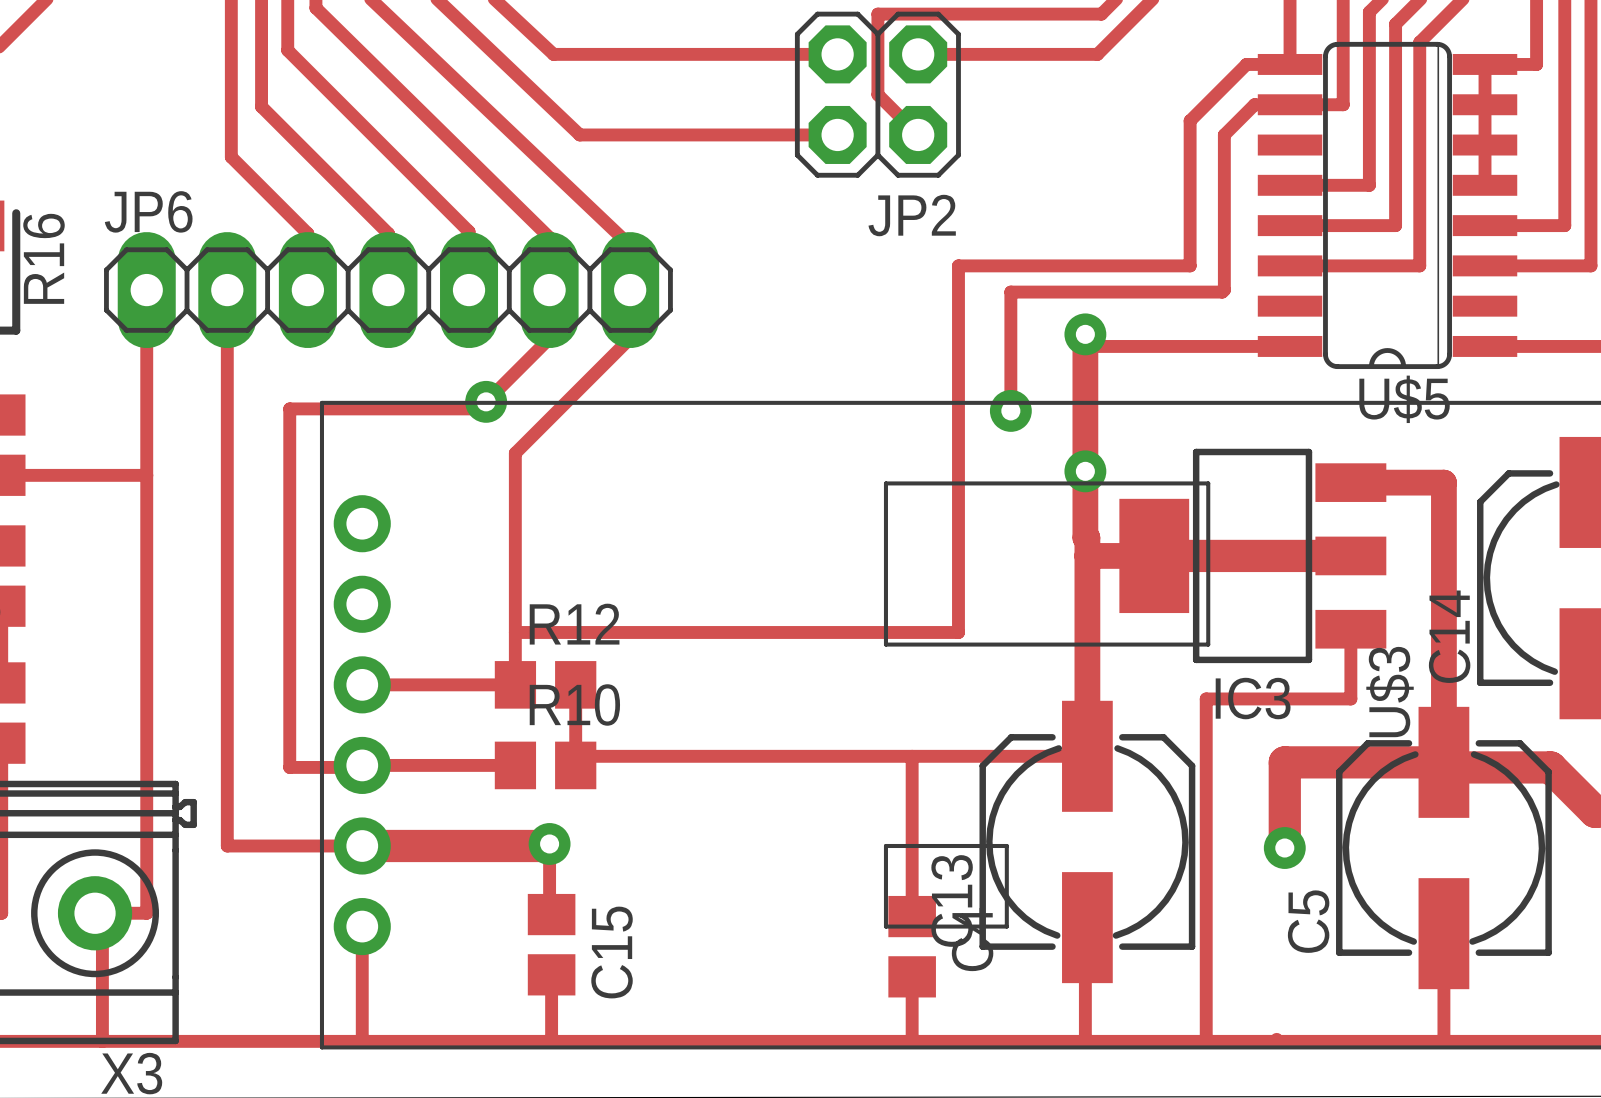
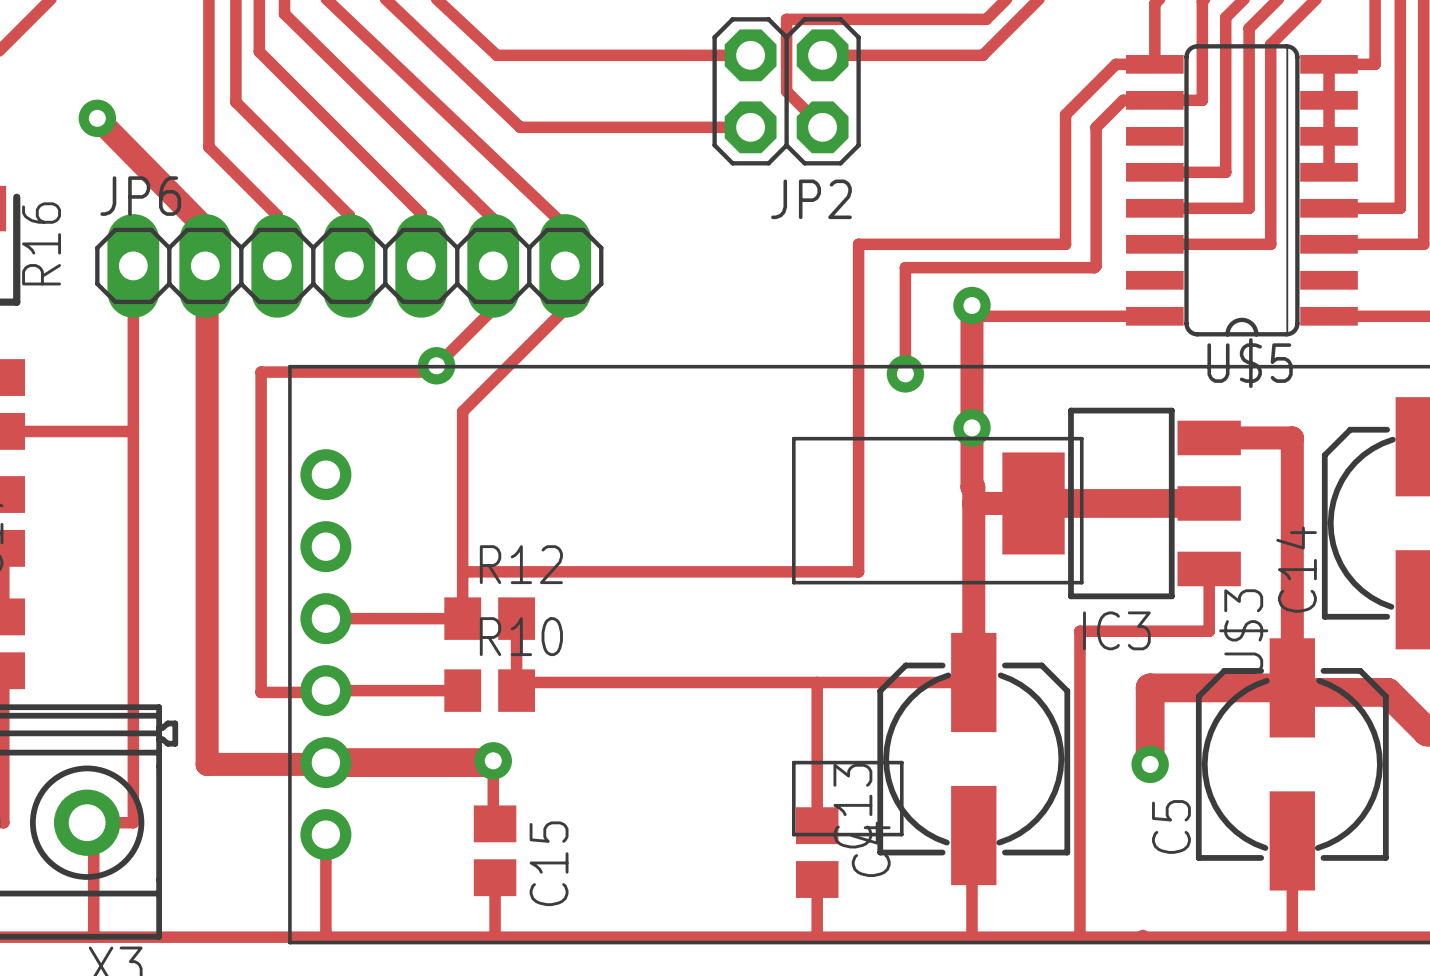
via: none -> (97, 118)
track: (227, 290) (227, 845) (362, 845) -> (97, 118) (207, 229) (207, 764) (324, 764) (325, 762)

